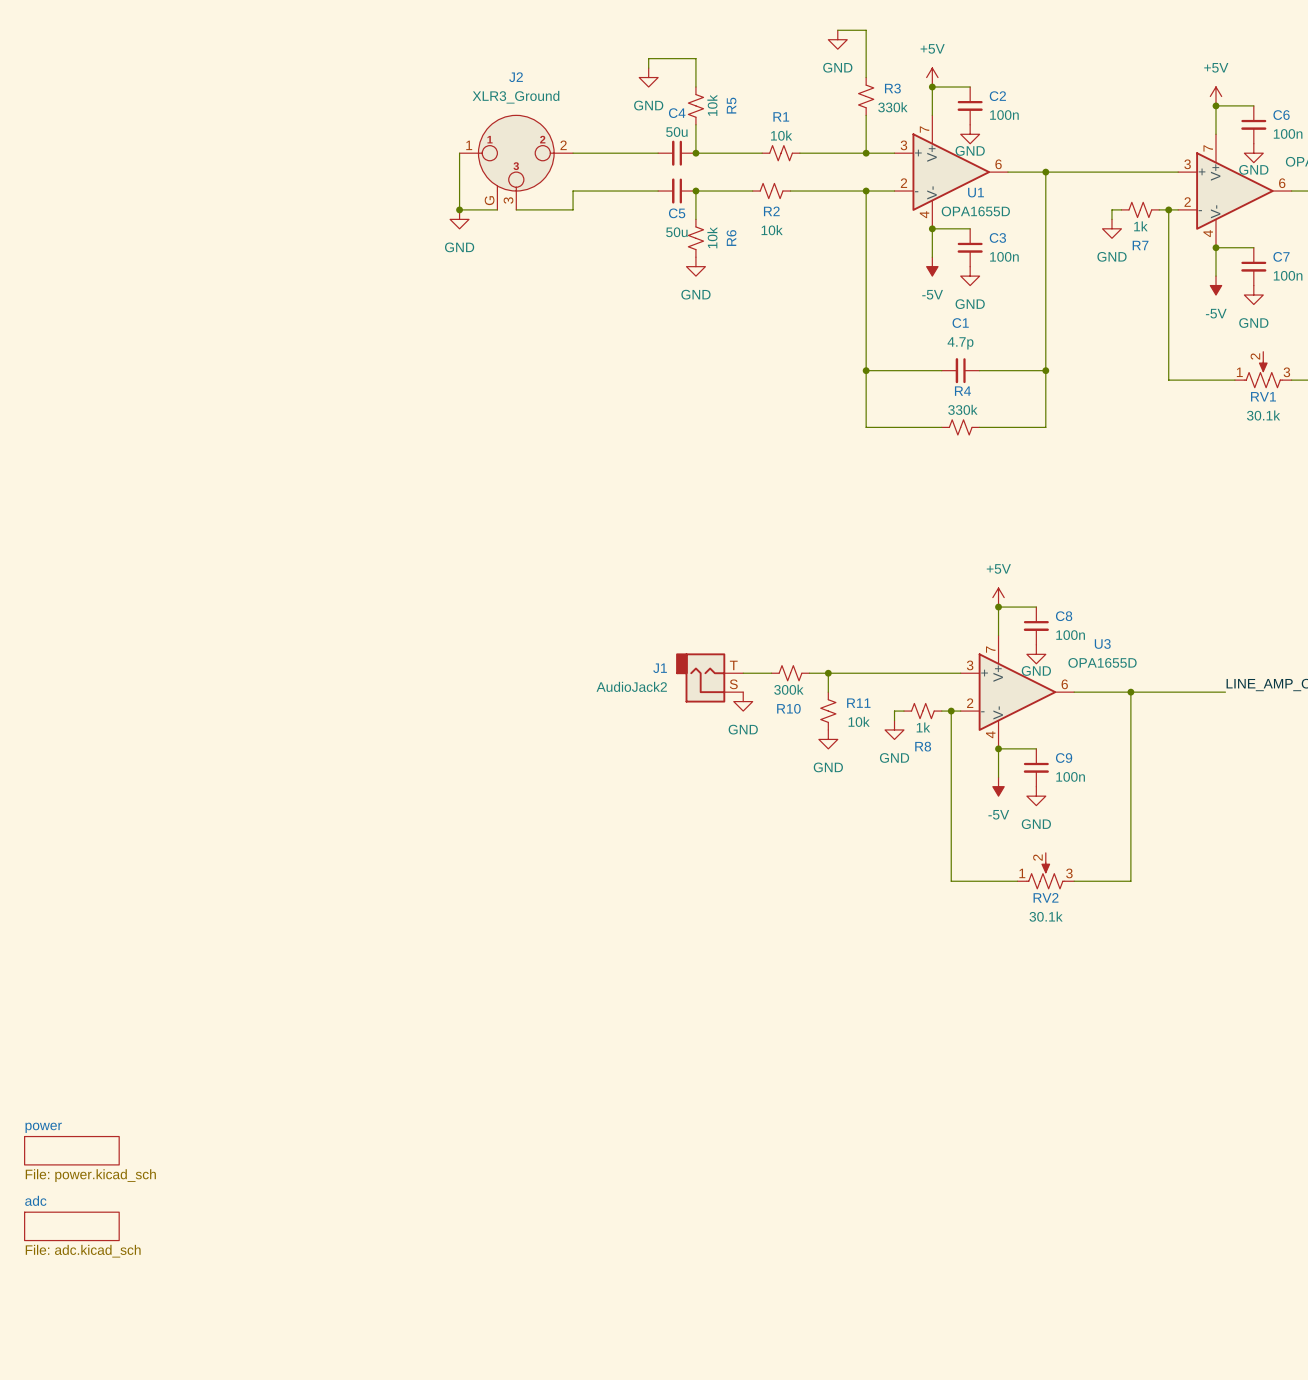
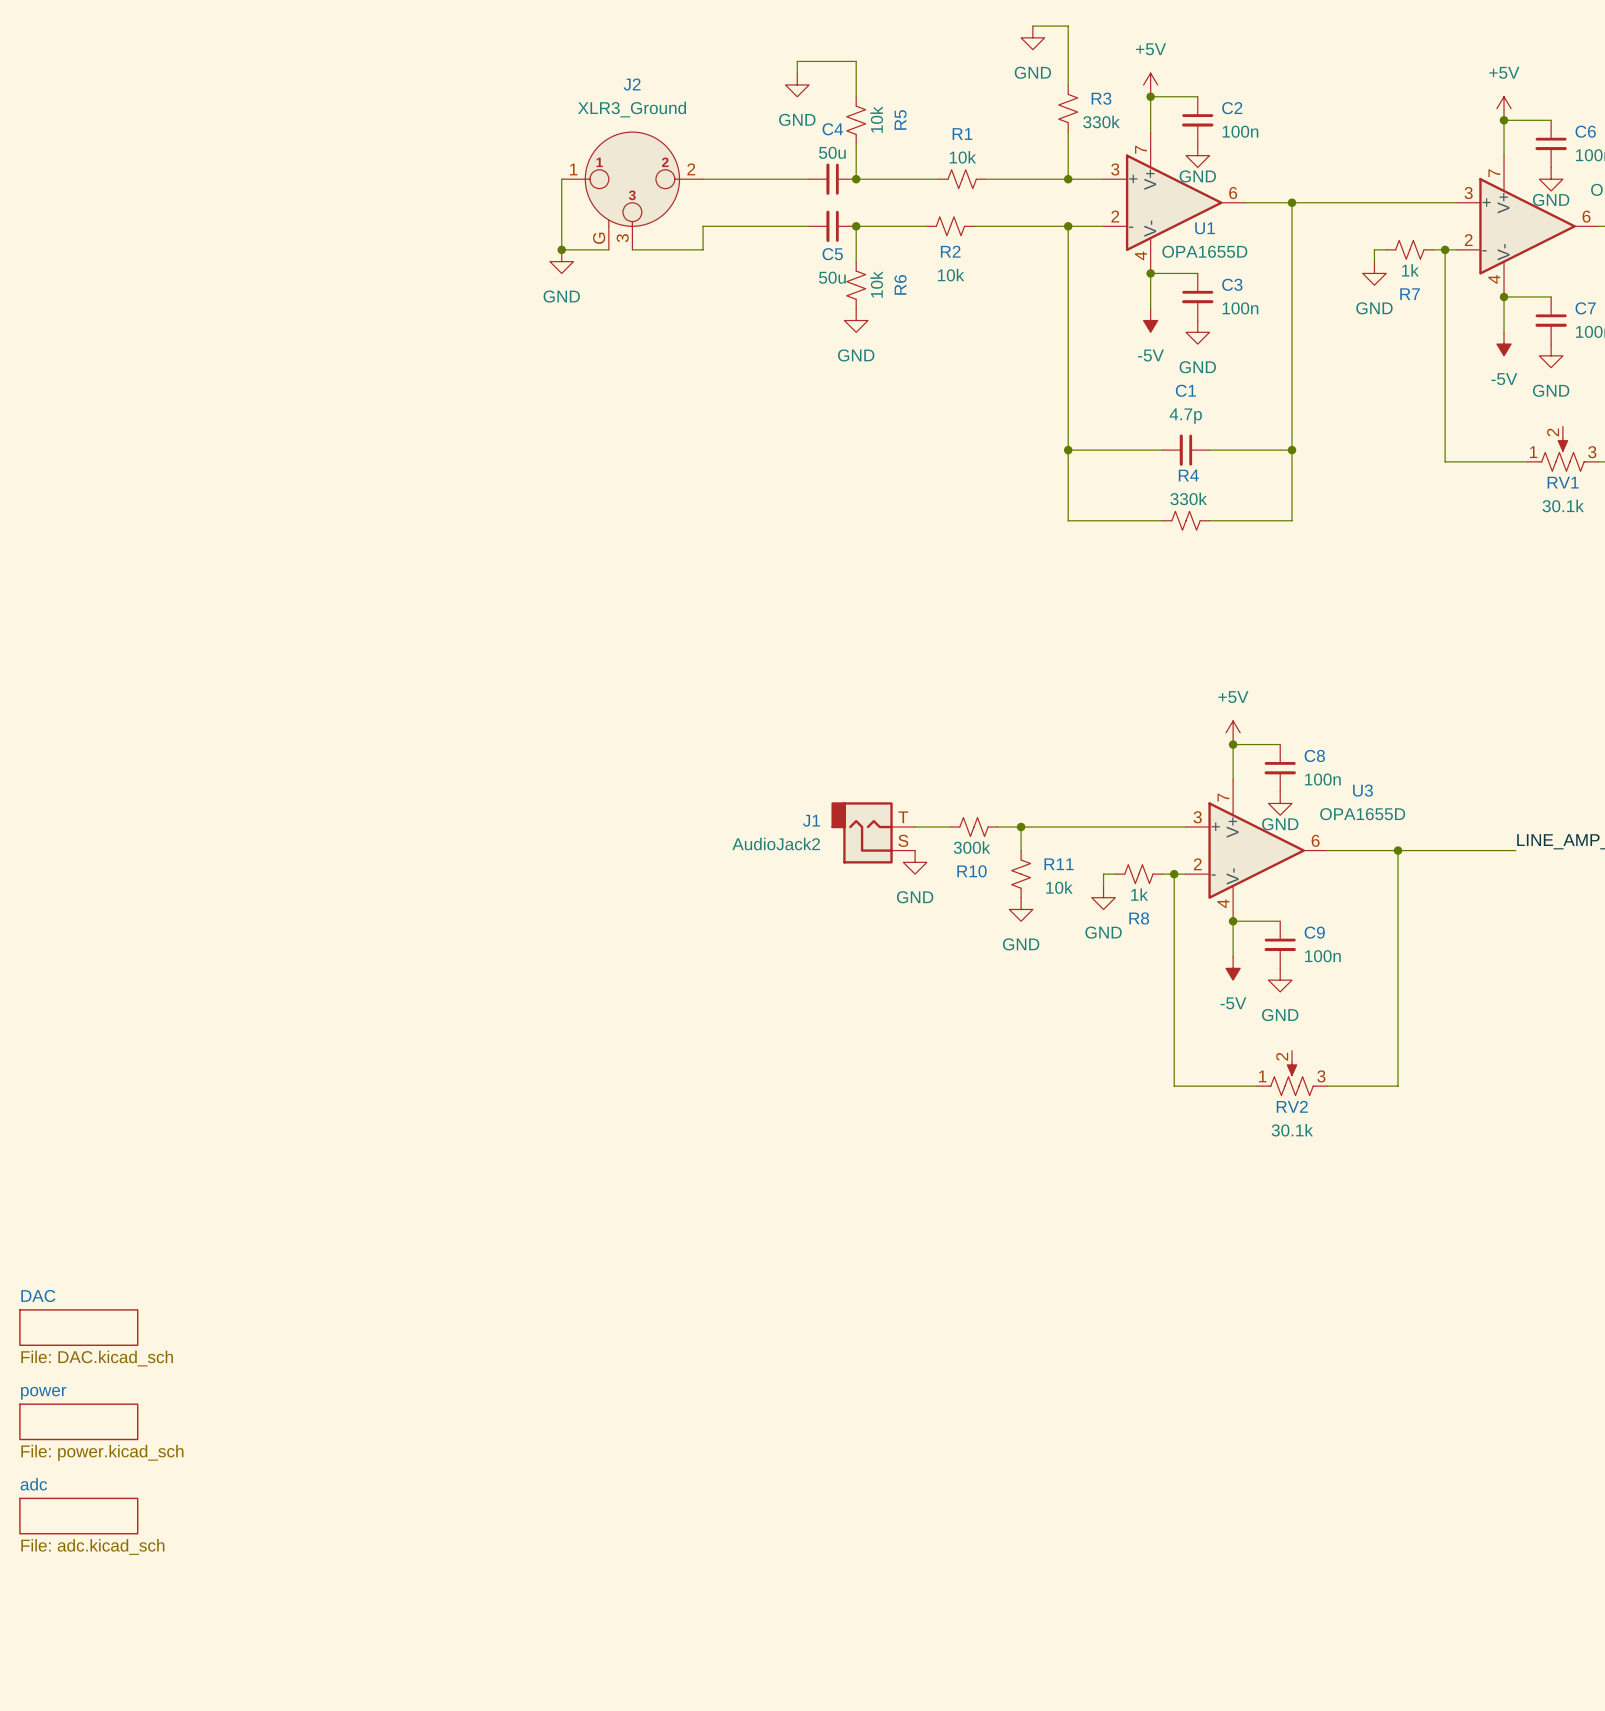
sheet DAC: none -> File: DAC.kicad_sch (78, 1327)

